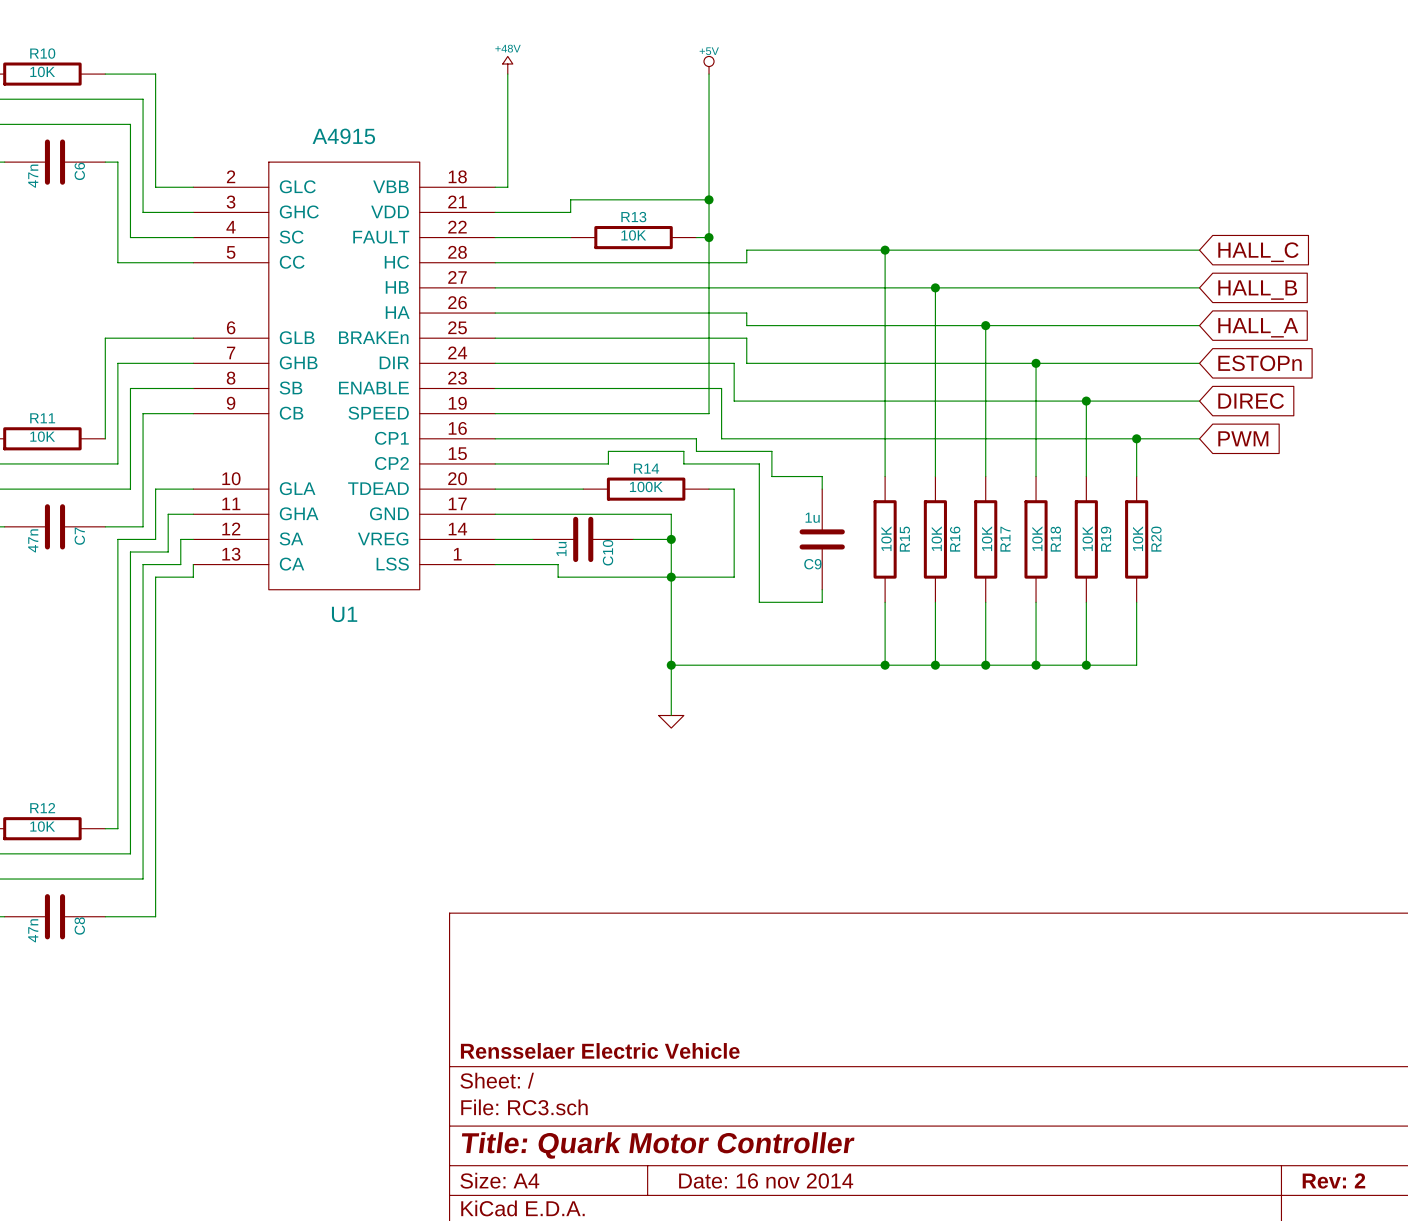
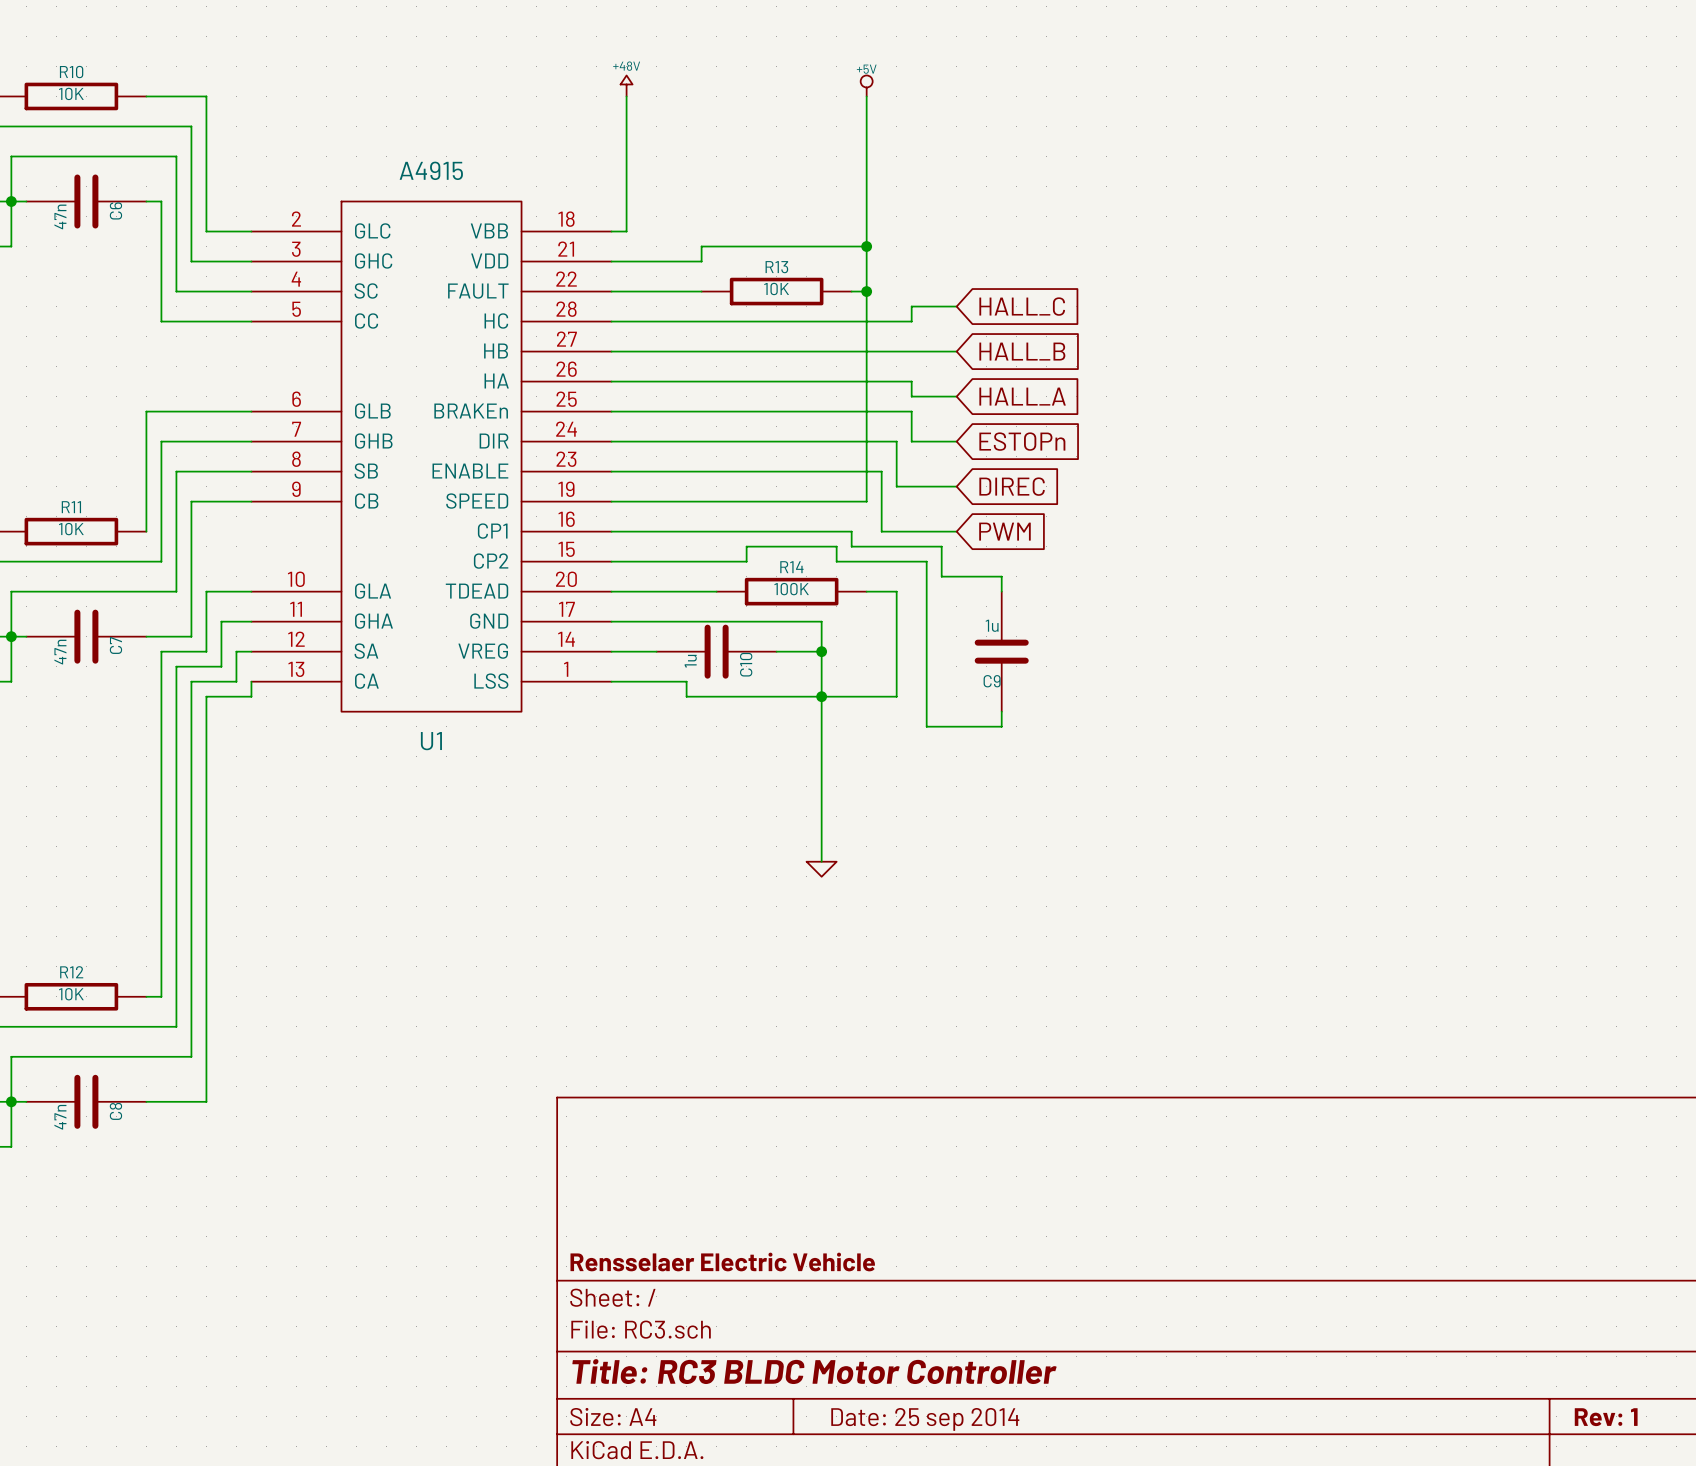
wire: (784, 250) (1199, 250) -> none
wire: (885, 250) (885, 476) -> none
junction: (885, 250) -> none
global label: none -> HALL_C (1022, 306)
global label: HALL_C (1258, 252) -> none
wire: (784, 287) (1199, 287) -> none
wire: (935, 287) (935, 476) -> none
junction: (935, 287) -> none
global label: none -> HALL_B (1022, 351)
global label: HALL_B (1257, 290) -> none
wire: (784, 325) (1199, 325) -> none
wire: (985, 325) (985, 476) -> none
junction: (985, 325) -> none
global label: none -> HALL_A (1022, 396)
global label: HALL_A (1258, 327) -> none
wire: (784, 363) (1199, 363) -> none
global label: none -> ESTOPn (1022, 441)
wire: (1036, 363) (1036, 476) -> none
junction: (1036, 363) -> none
global label: ESTOPn (1259, 363) -> none
wire: (784, 401) (1199, 401) -> none
global label: none -> DIREC (1012, 486)
wire: (1086, 401) (1086, 476) -> none
junction: (1086, 401) -> none
global label: DIREC (1251, 401) -> none
wire: (784, 438) (1199, 438) -> none
global label: none -> PWM (1004, 531)
wire: (1136, 438) (1136, 476) -> none
junction: (1136, 438) -> none
global label: PWM (1243, 438) -> none
R15: 10K (885, 539) -> none
R16: 10K (935, 539) -> none
R17: 10K (985, 539) -> none
R18: 10K (1036, 539) -> none
R19: 10K (1086, 539) -> none
R20: 10K (1136, 539) -> none
wire: (885, 602) (885, 665) -> none
wire: (935, 602) (935, 665) -> none
wire: (985, 602) (985, 665) -> none
wire: (1036, 602) (1036, 665) -> none
wire: (1086, 602) (1086, 665) -> none
wire: (1136, 602) (1136, 665) (671, 665) -> none
junction: (671, 665) -> none
junction: (885, 665) -> none
junction: (935, 665) -> none
junction: (985, 665) -> none
junction: (1036, 665) -> none
junction: (1086, 665) -> none
title block: Title: Quark Motor Controller (658, 1145) -> Title: RC3 BLDC Motor Controller (814, 1371)
title block: Date: 16 nov 2014 (766, 1180) -> Date: 25 sep 2014 (925, 1419)
title block: Rev: 2 (1333, 1180) -> Rev: 1 (1606, 1417)

